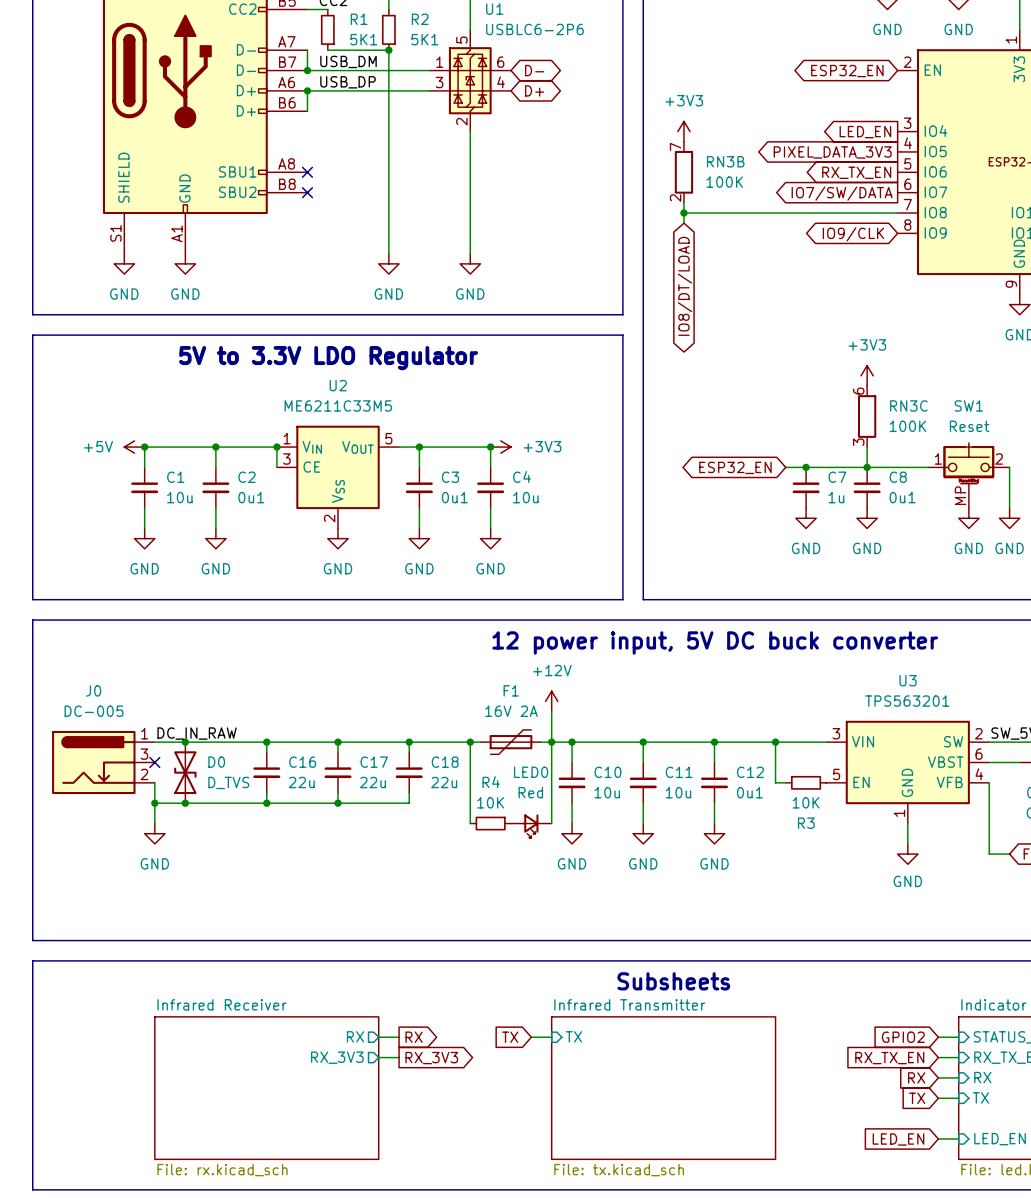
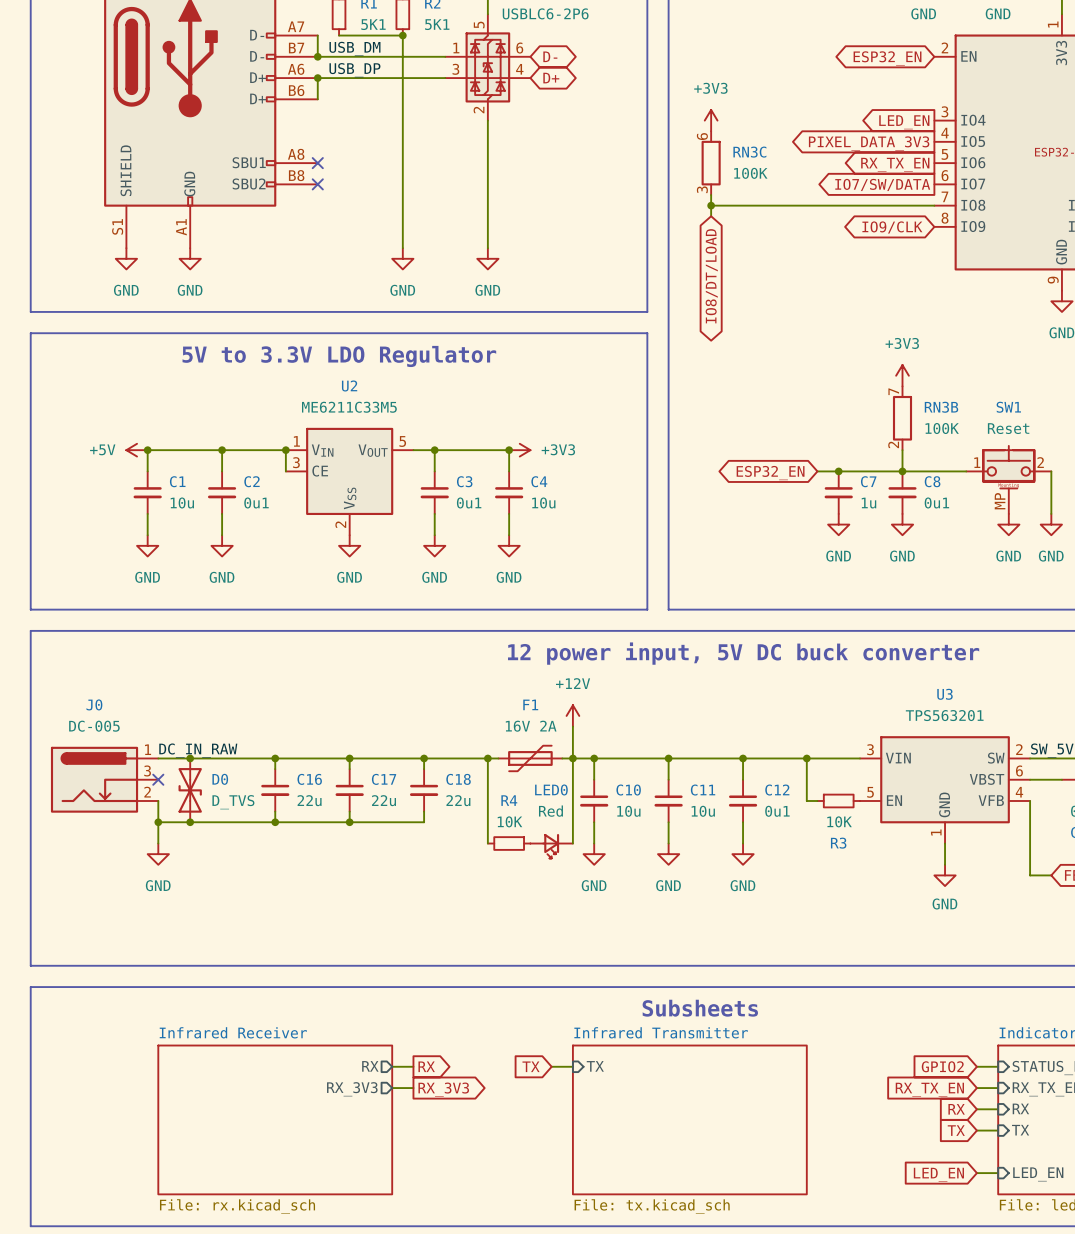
RN3B position: (683, 172) -> (902, 418)
RN3C position: (867, 416) -> (711, 163)

